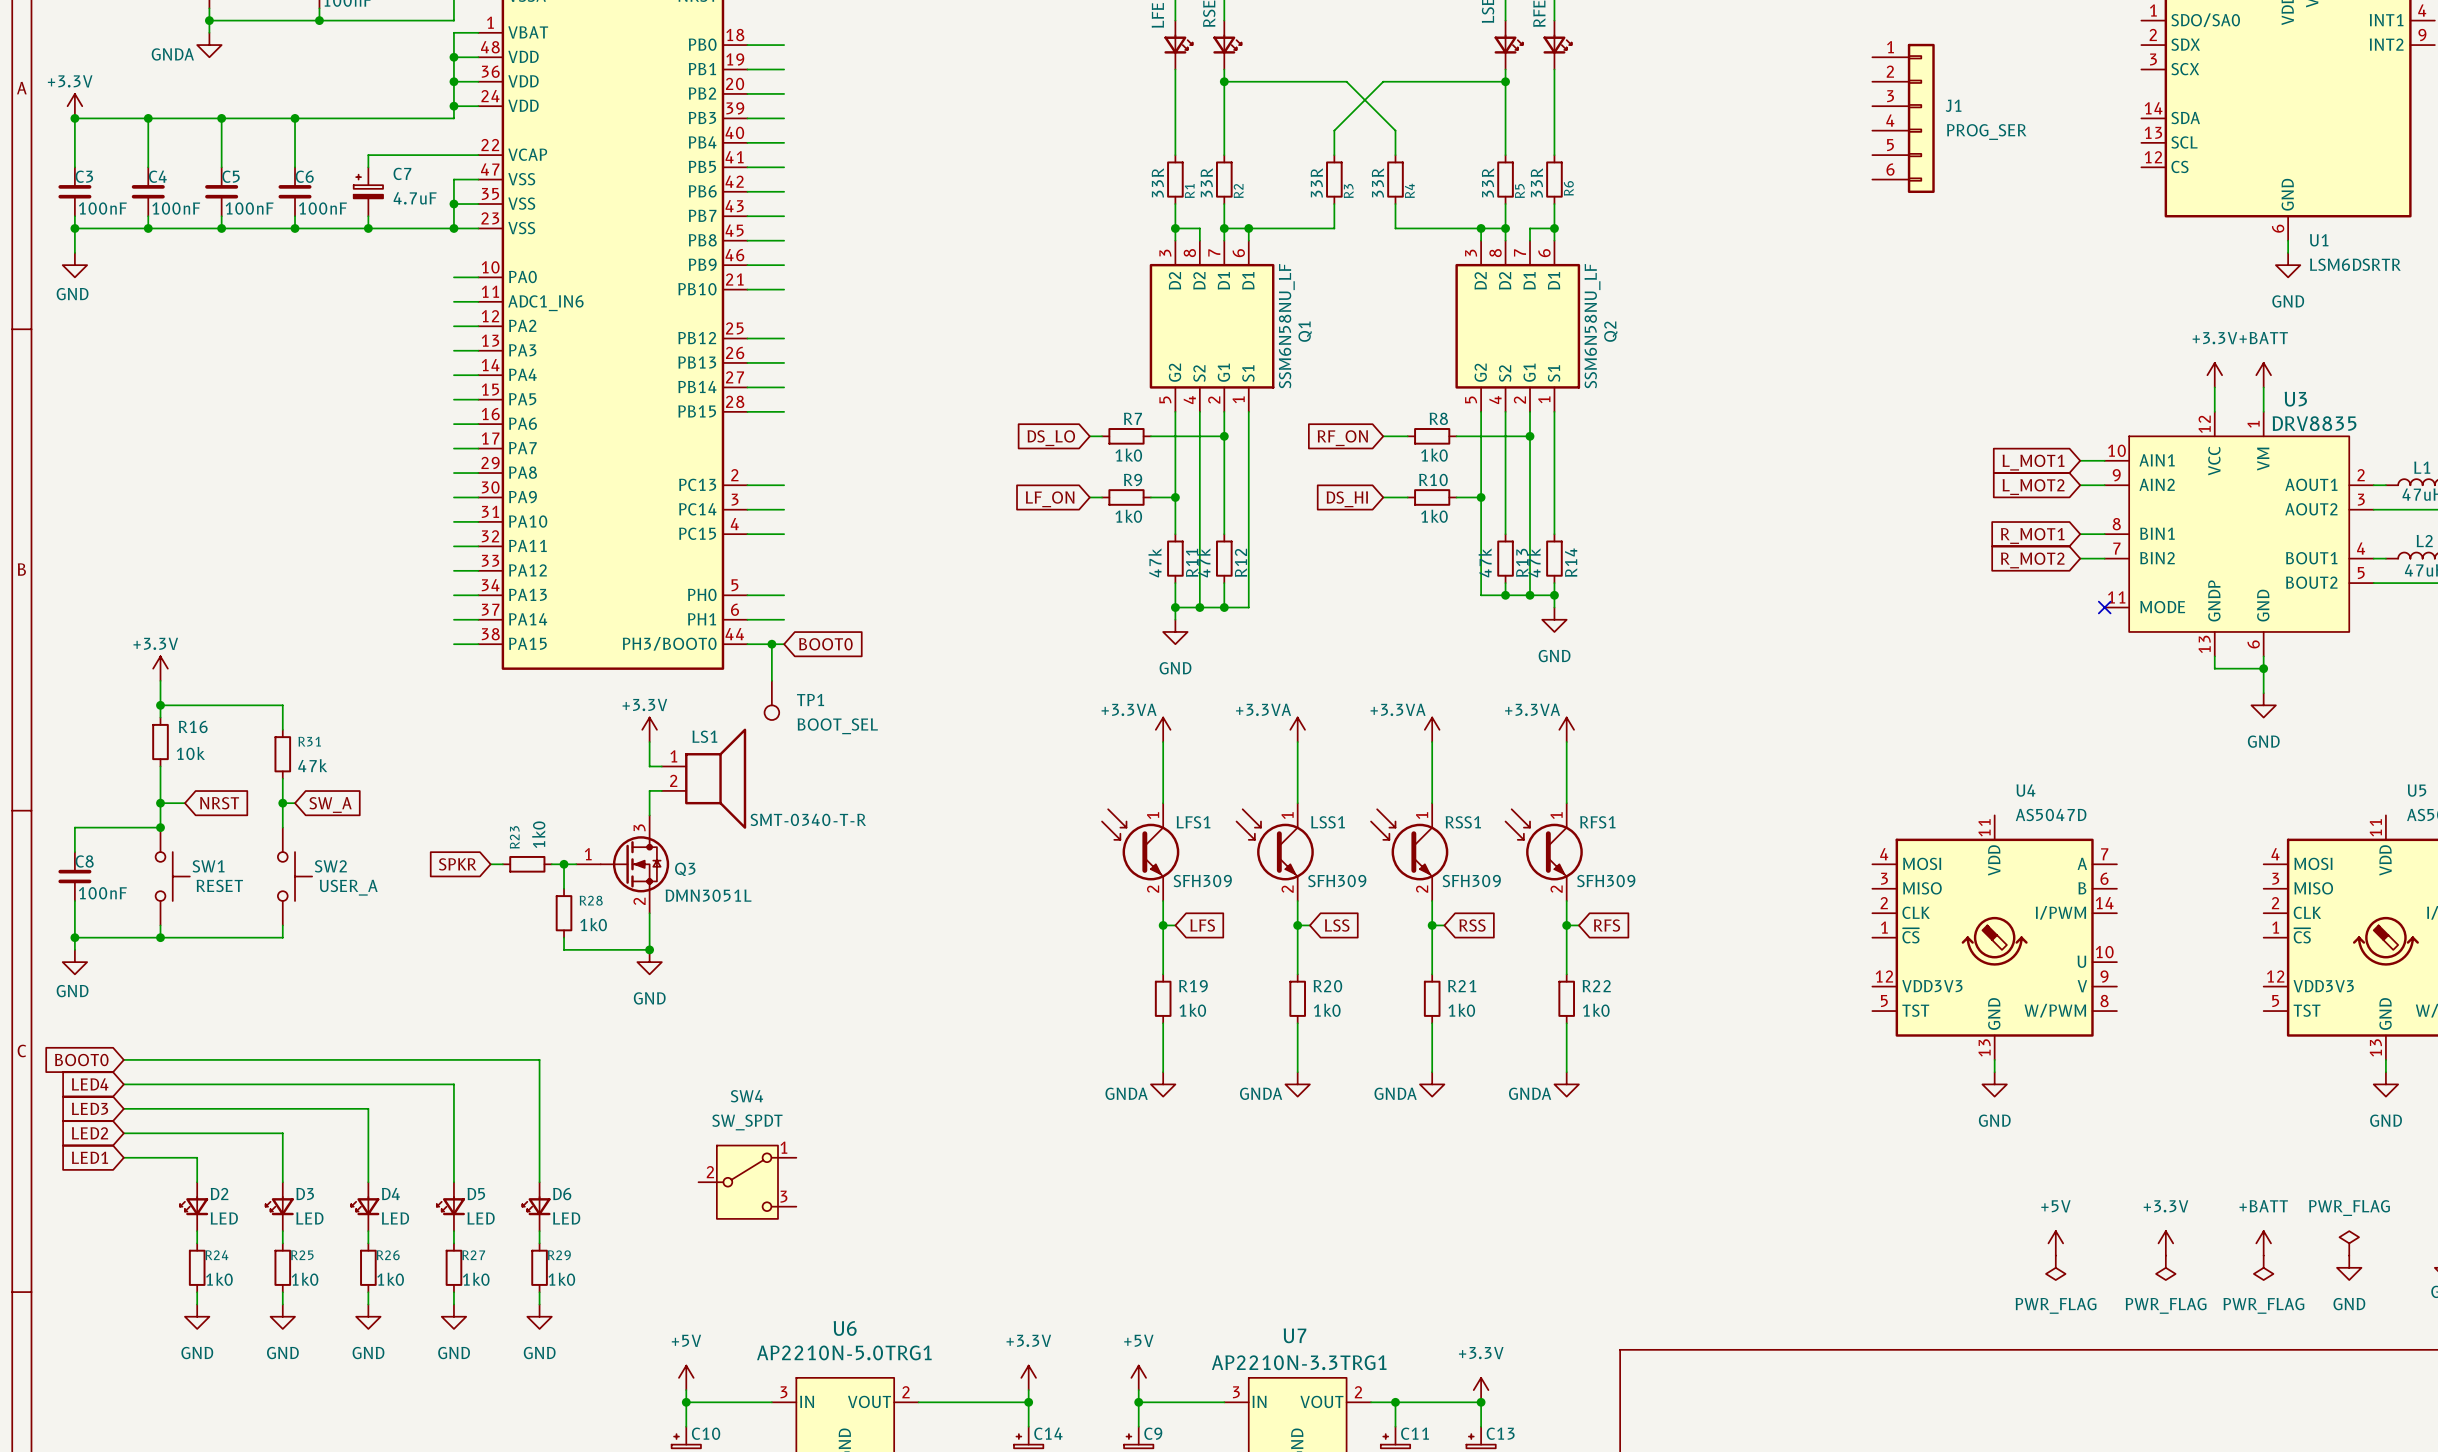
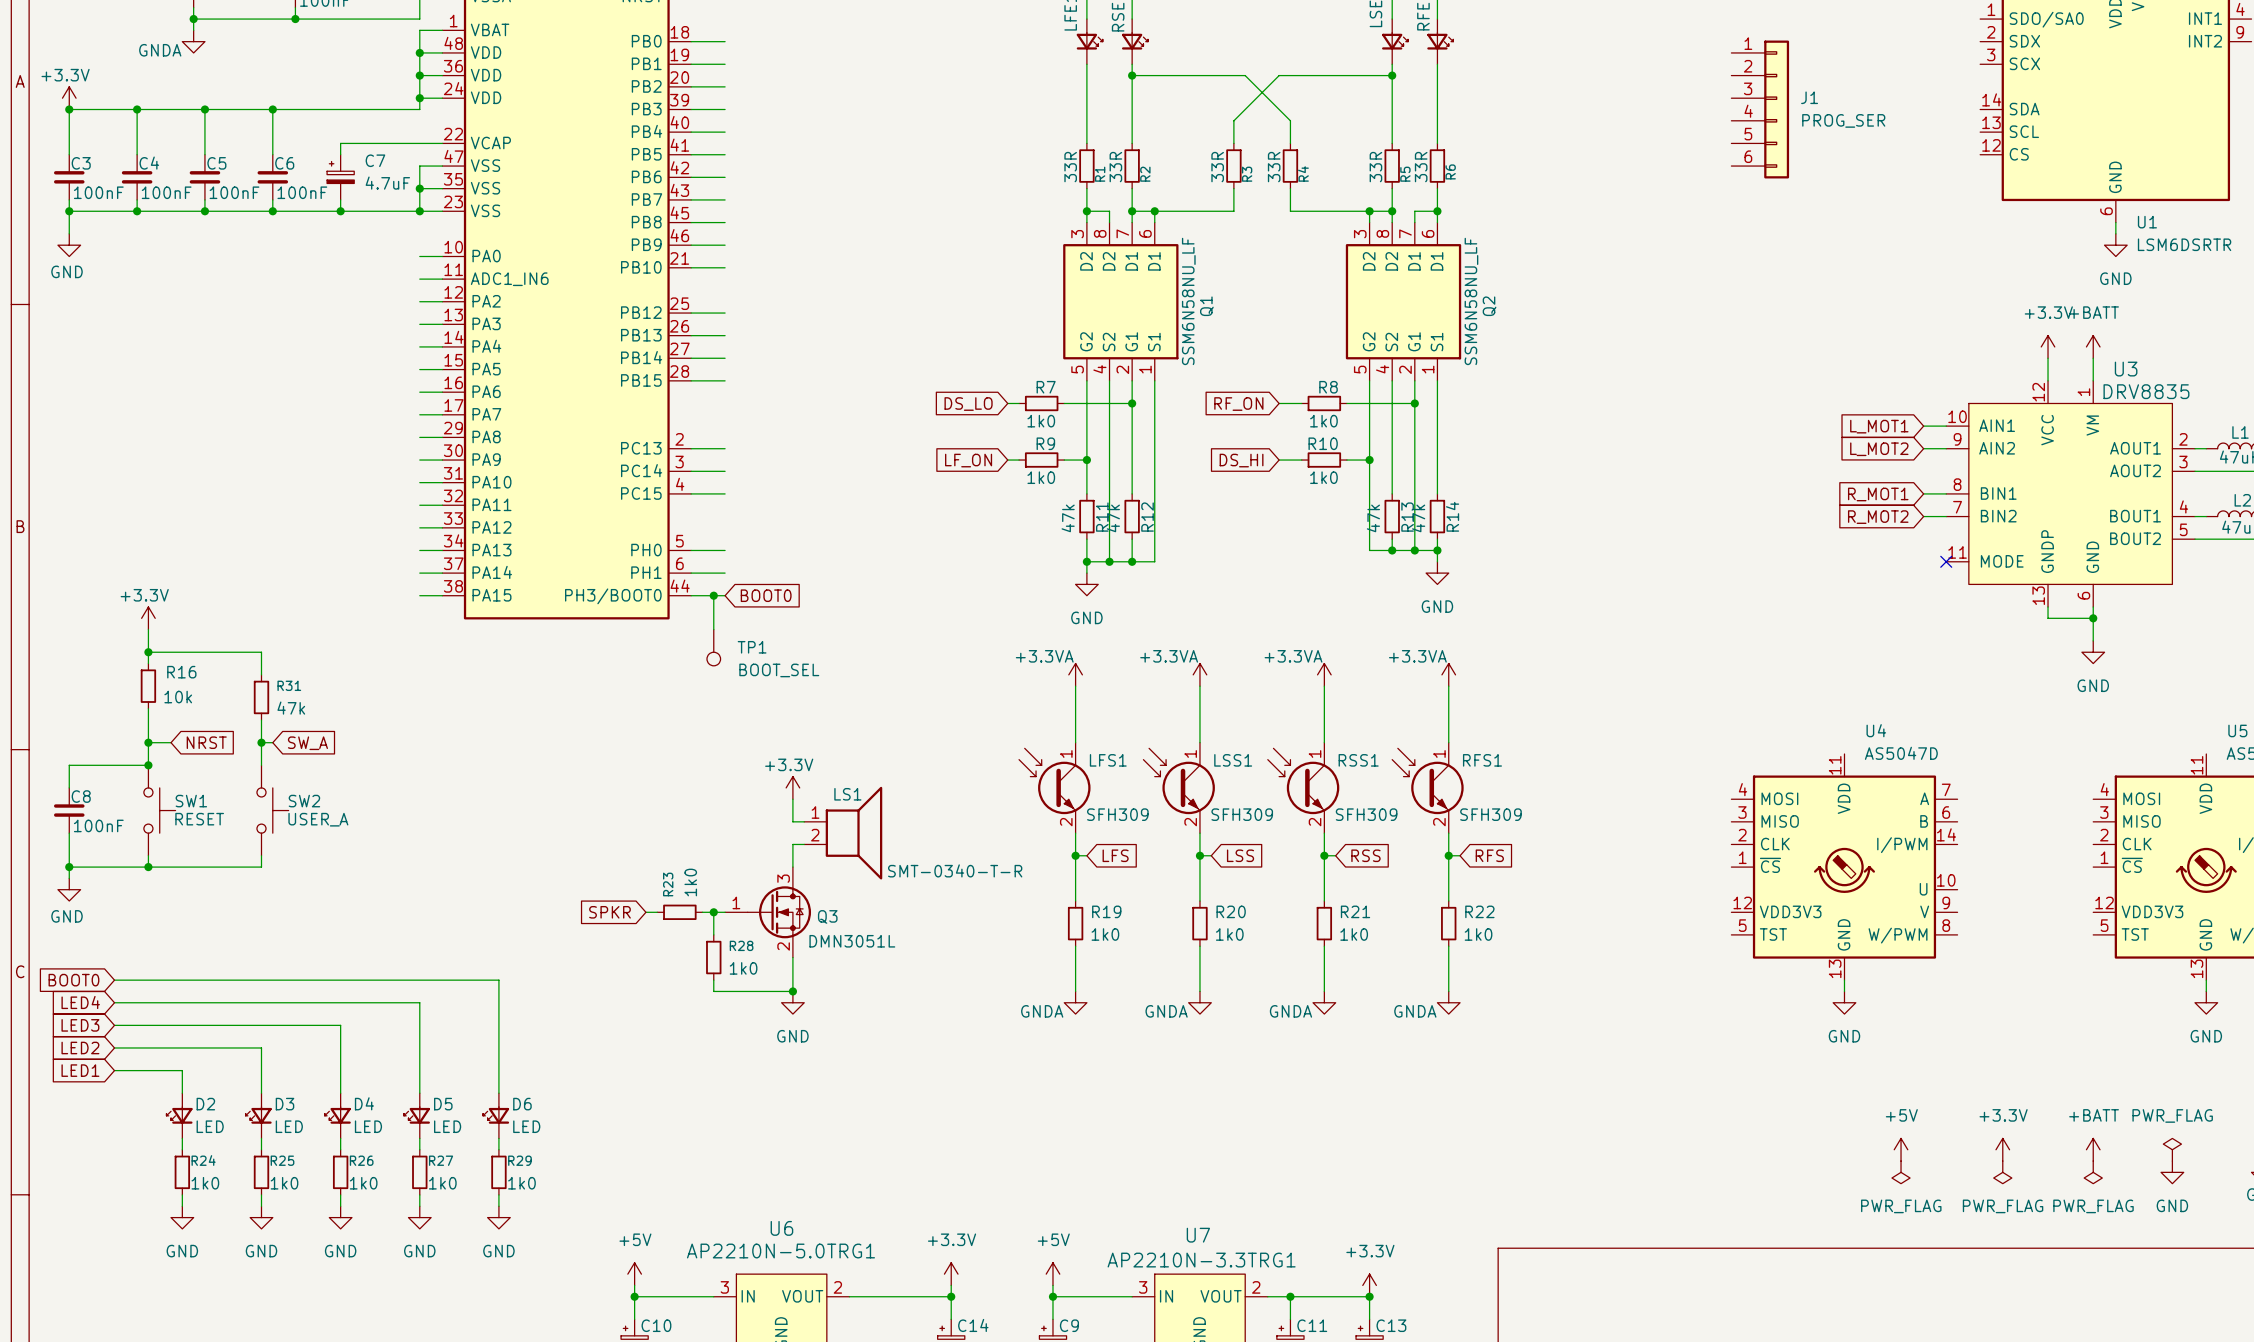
power symbol: +3.3V (649, 729) -> none
wire: (649, 742) (649, 766) (661, 766) -> none
LS1 position: (704, 778) -> (843, 833)
wire: (661, 790) (649, 790) (649, 815) -> none
power symbol: none -> +3.3V (792, 787)
global label: SPKR (457, 864) -> none
wire: (490, 864) (502, 864) -> none
R23 position: (527, 864) -> (679, 912)
wire: (551, 864) (576, 864) -> none
wire: (564, 864) (564, 888) -> none
junction: (564, 864) -> none
Q3 position: (622, 864) -> (768, 912)
wire: none -> (792, 799) (792, 821) (804, 821)
R28 position: (564, 913) -> (713, 957)
wire: (649, 913) (649, 949) (564, 949) (564, 937) -> none
wire: none -> (804, 844) (792, 844) (792, 867)
junction: (649, 949) -> none
power symbol: GND (649, 962) -> none
global label: none -> SPKR (609, 912)
wire: none -> (645, 912) (657, 912)
wire: none -> (702, 912) (725, 912)
wire: none -> (713, 912) (713, 934)
junction: none -> (713, 912)
wire: none -> (792, 957) (792, 991) (713, 991) (713, 980)
junction: none -> (792, 991)
power symbol: none -> GND (792, 1002)
SW4: SW_SPDT (747, 1182) -> none

